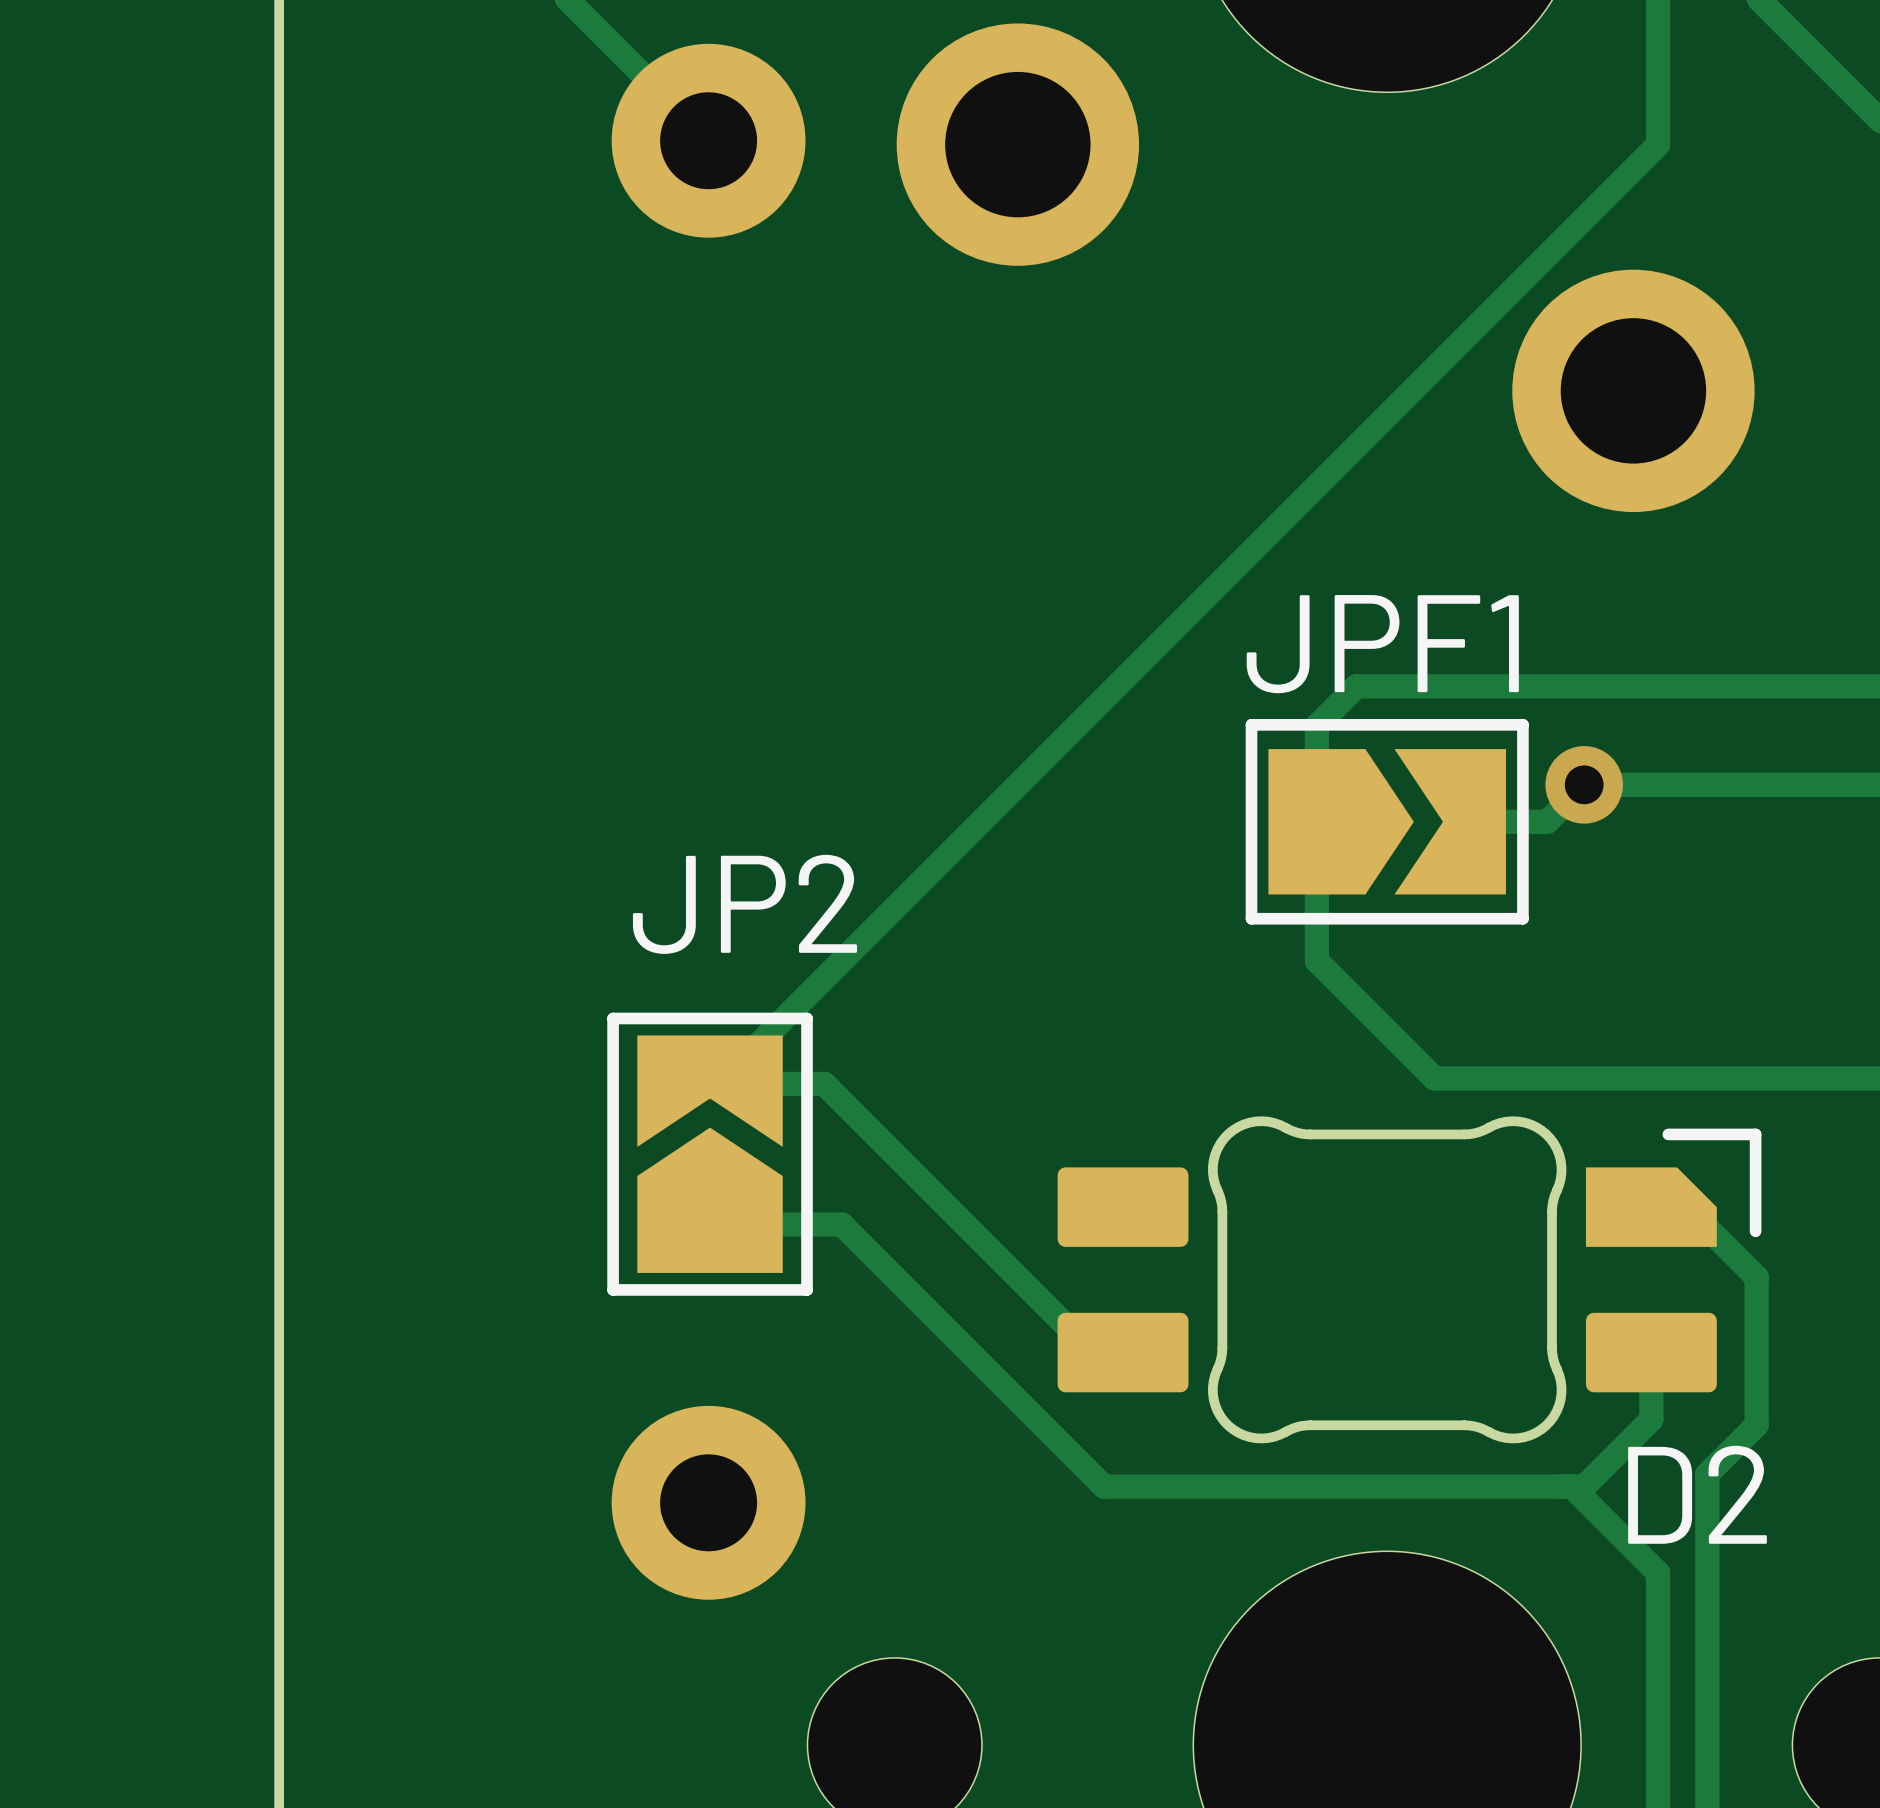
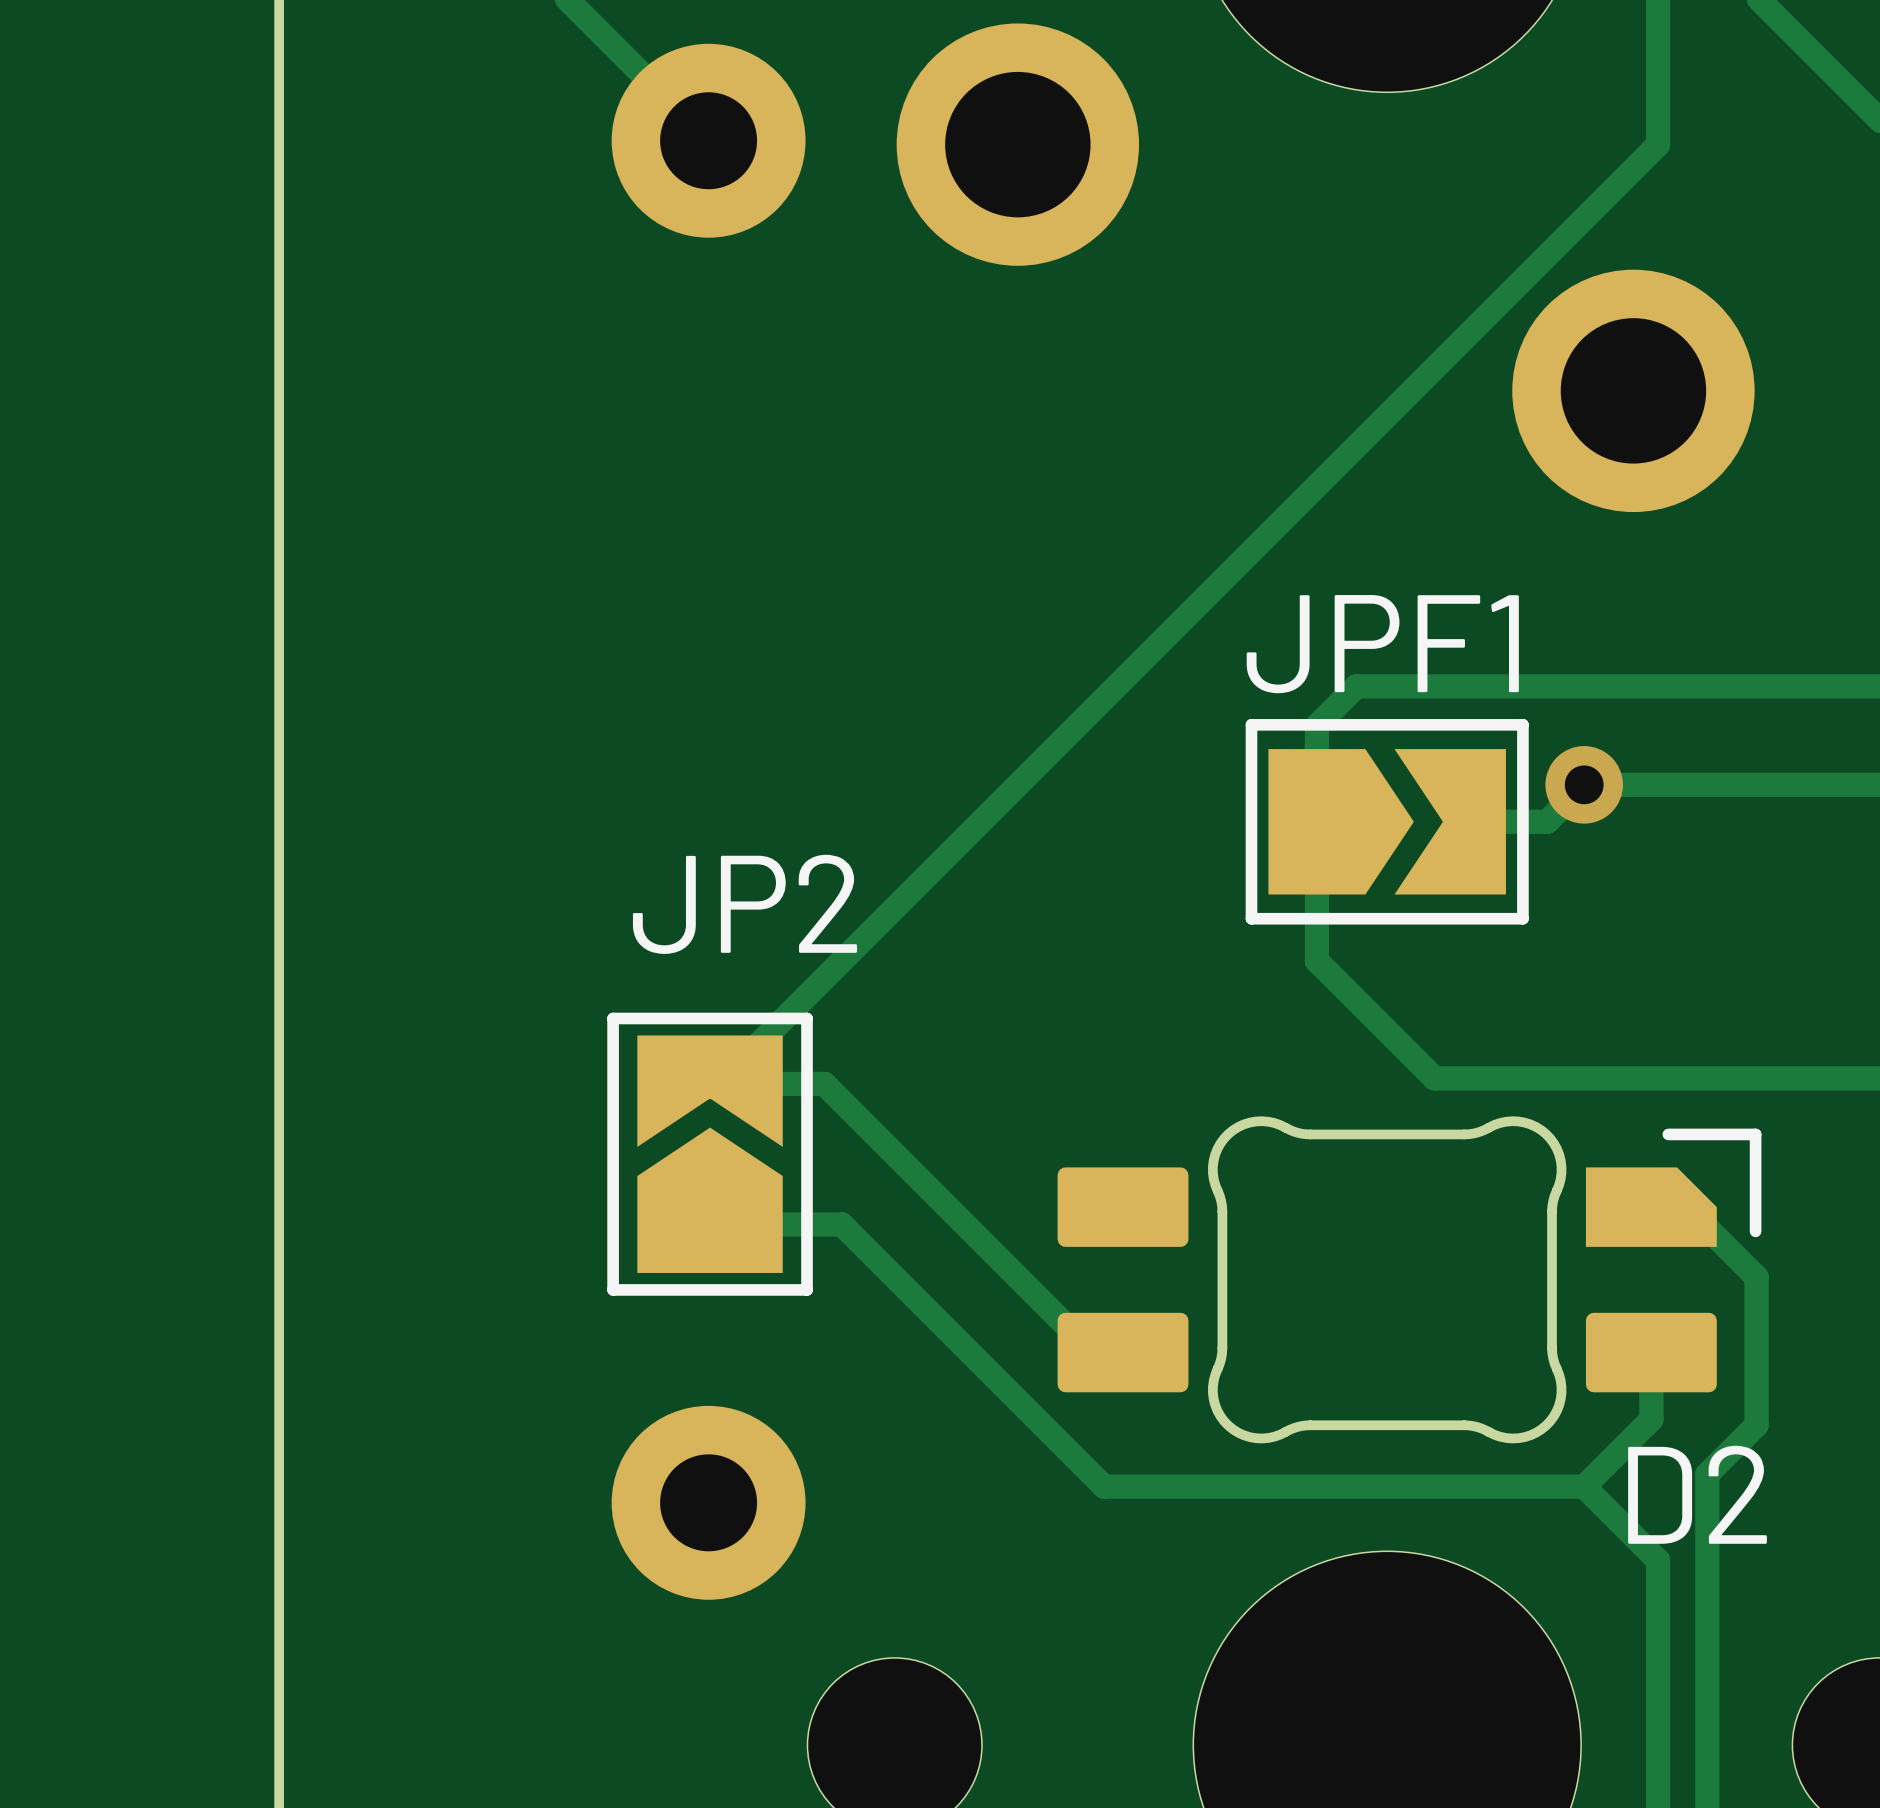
track: (1571, 1486) (1658, 1572) -> (1584, 1486) (1658, 1560) (1658, 1572)

